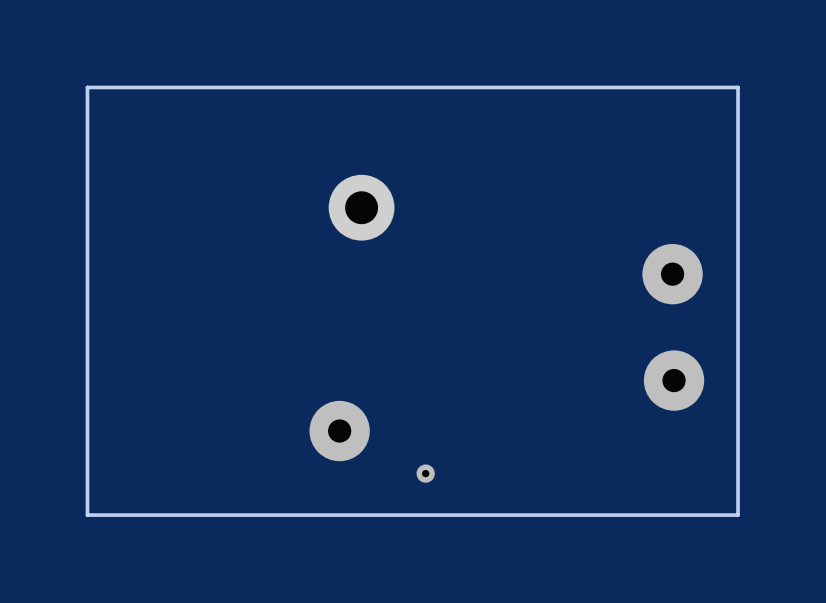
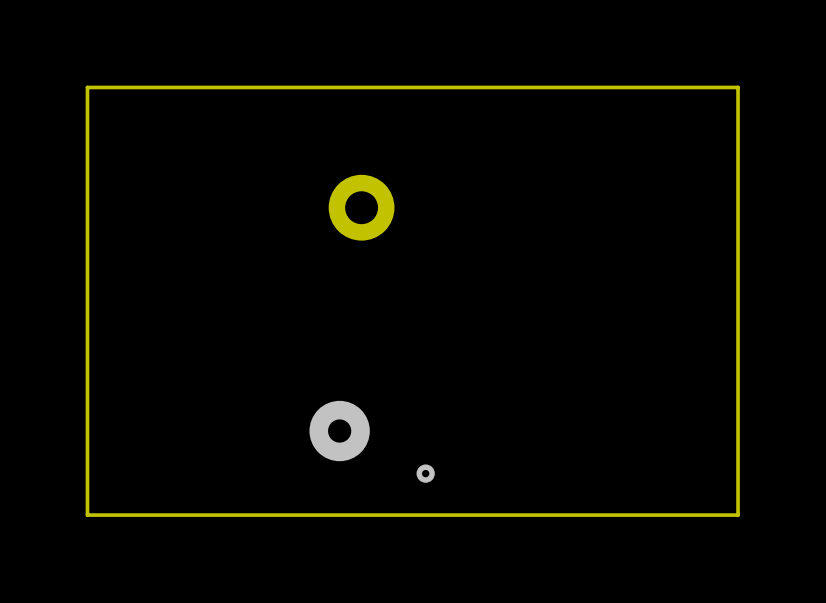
via: (672, 274) -> none
via: (674, 380) -> none

